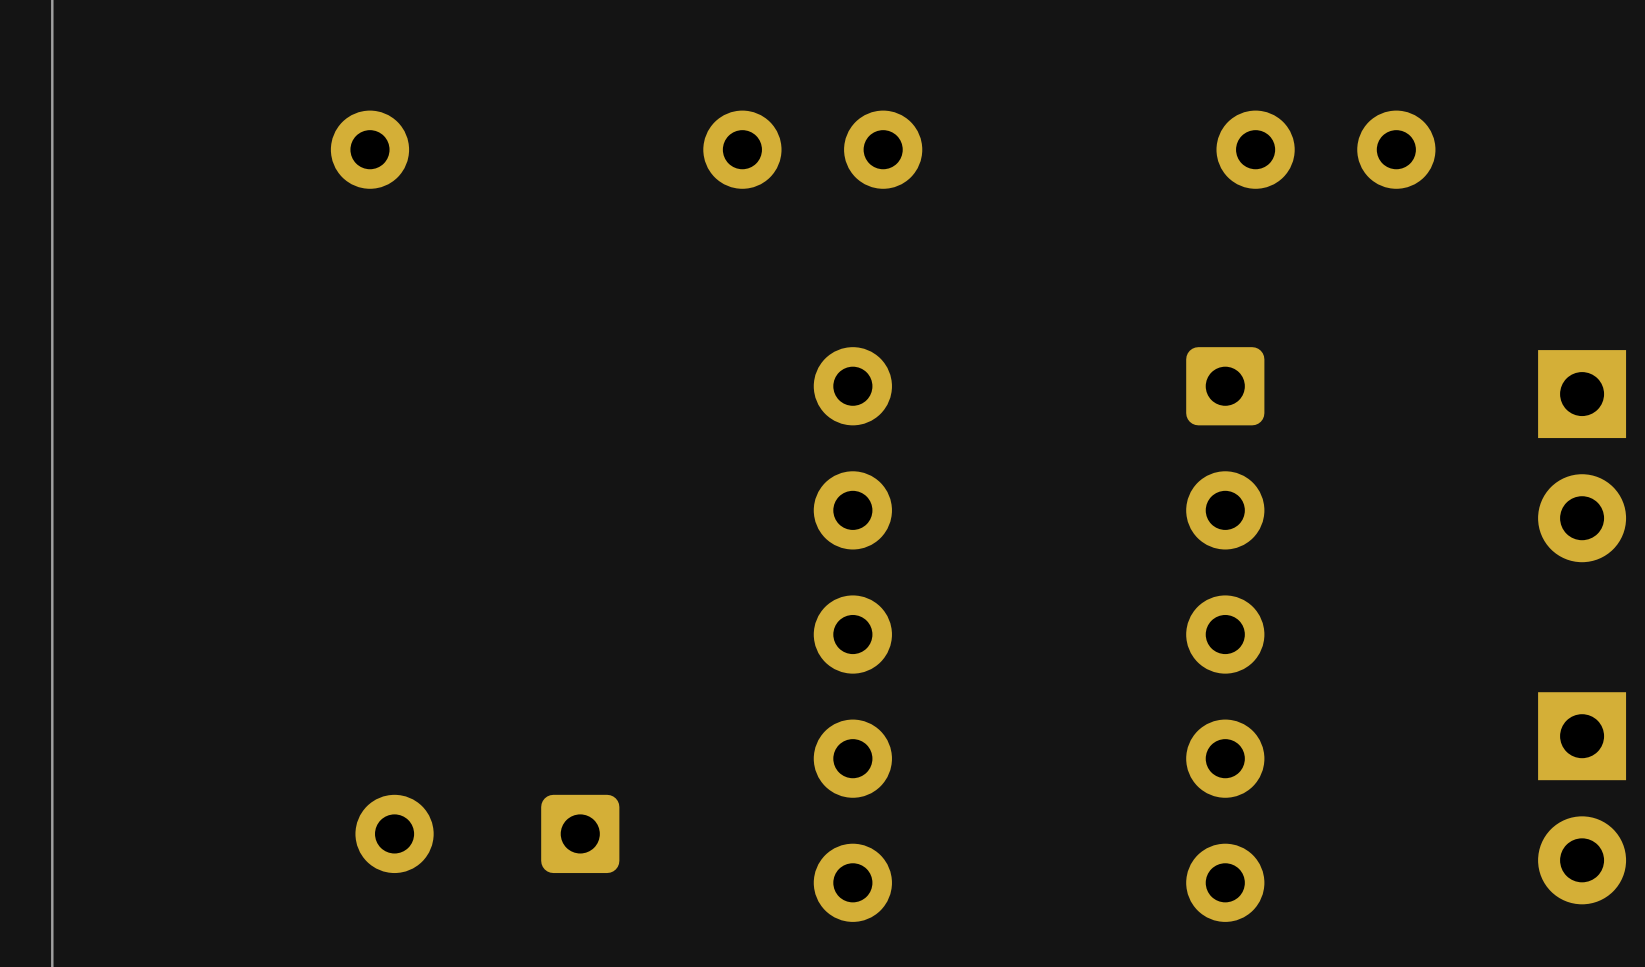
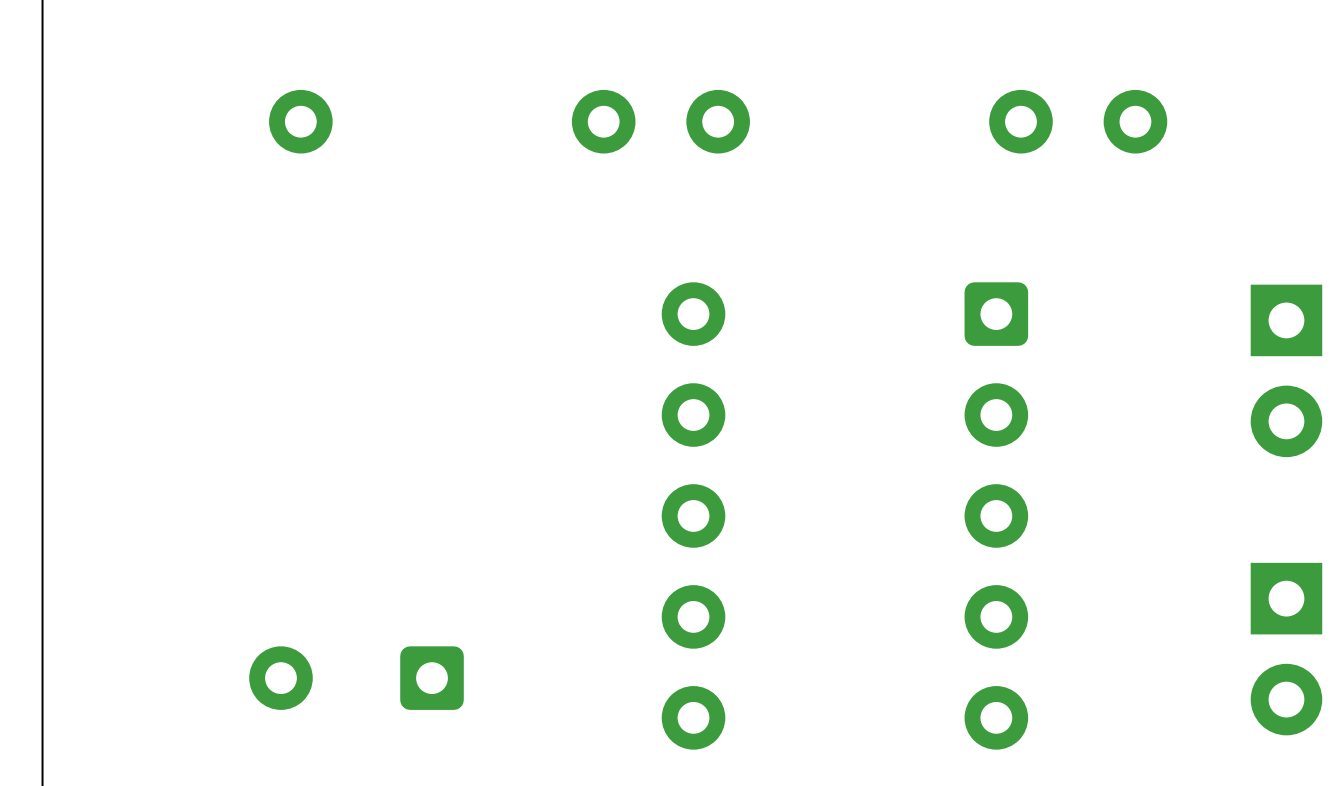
part position: (487, 833) -> (356, 678)

